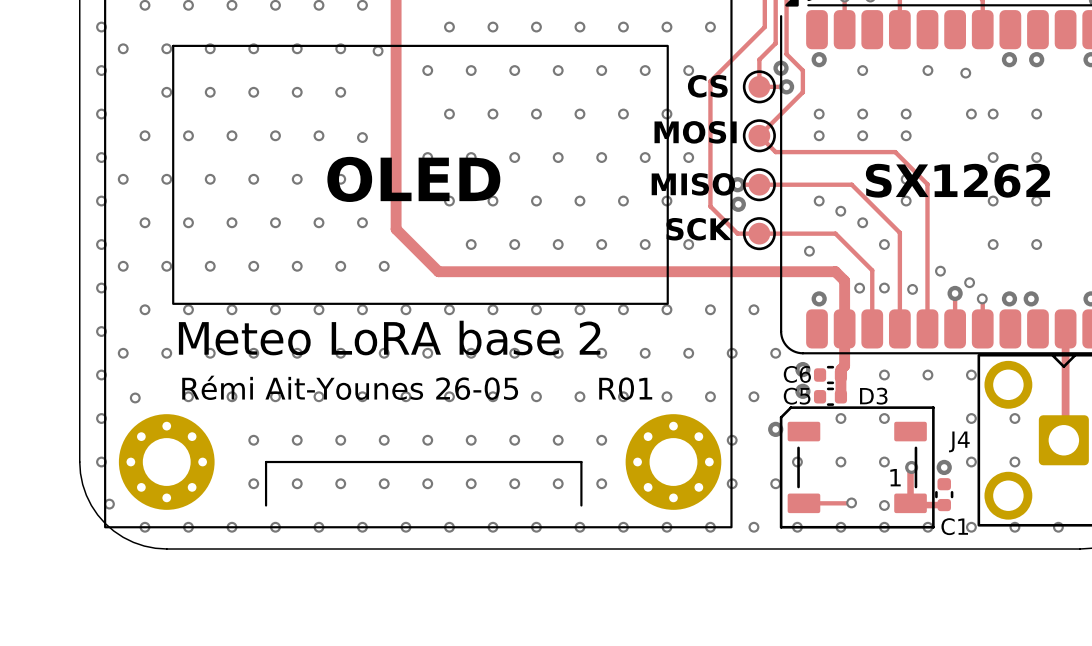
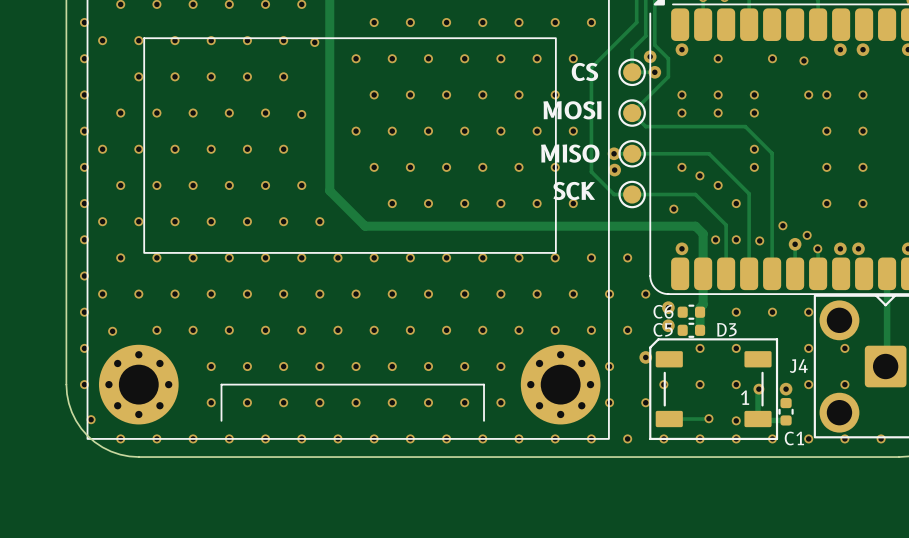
text: OLED (413, 179) -> none
text: SX1262 (957, 180) -> none
text: Meteo LoRA base 2 (389, 338) -> none
text: Rémi Ait-Younes 26-05 (350, 387) -> none
text: R01 (625, 388) -> none

